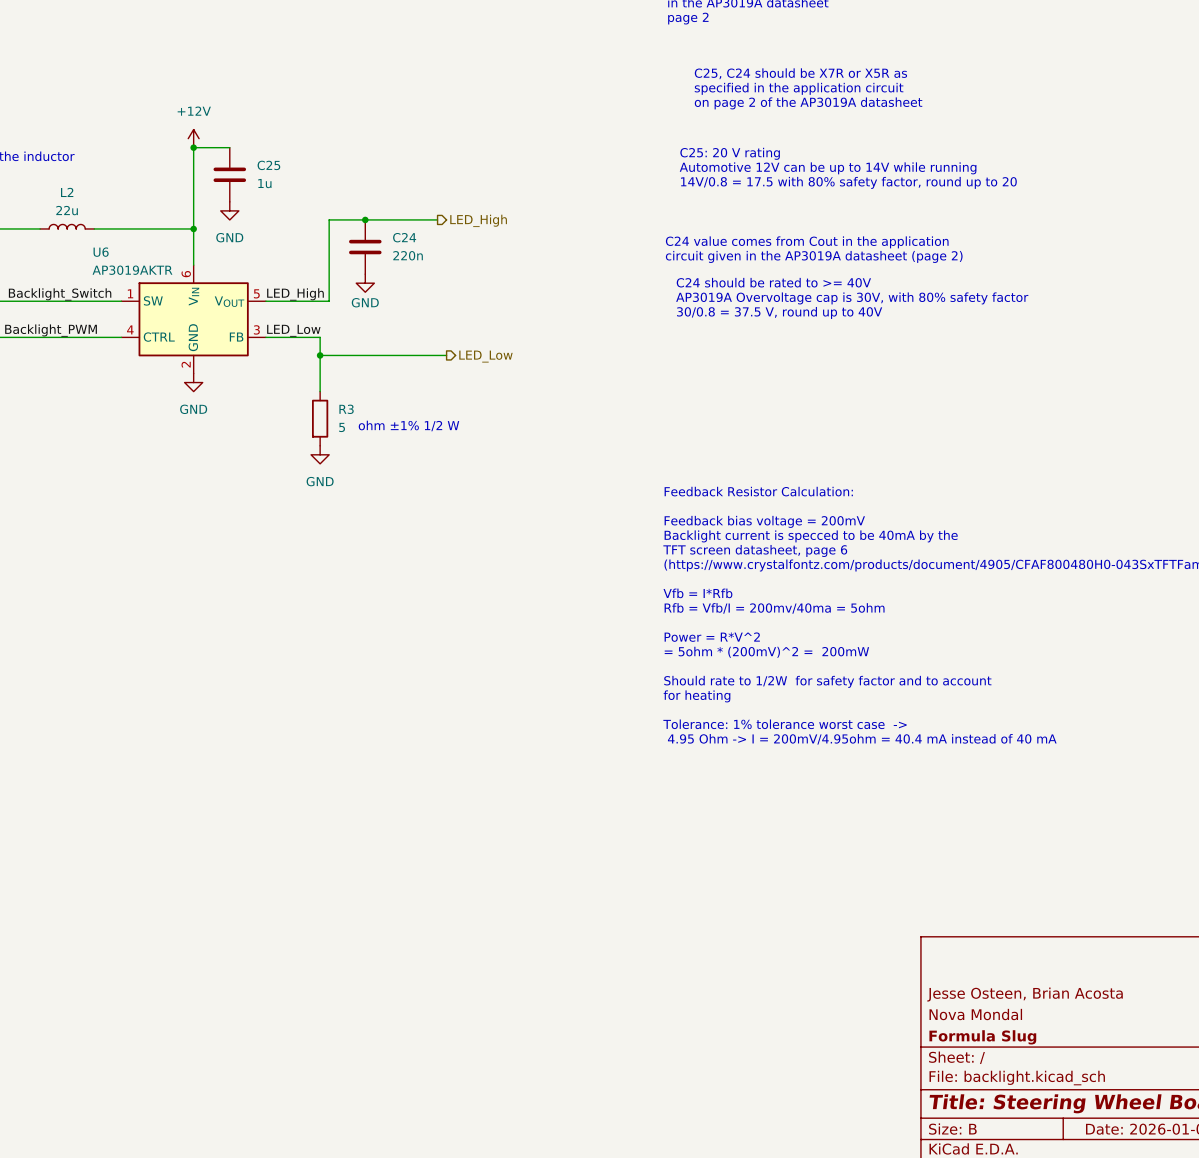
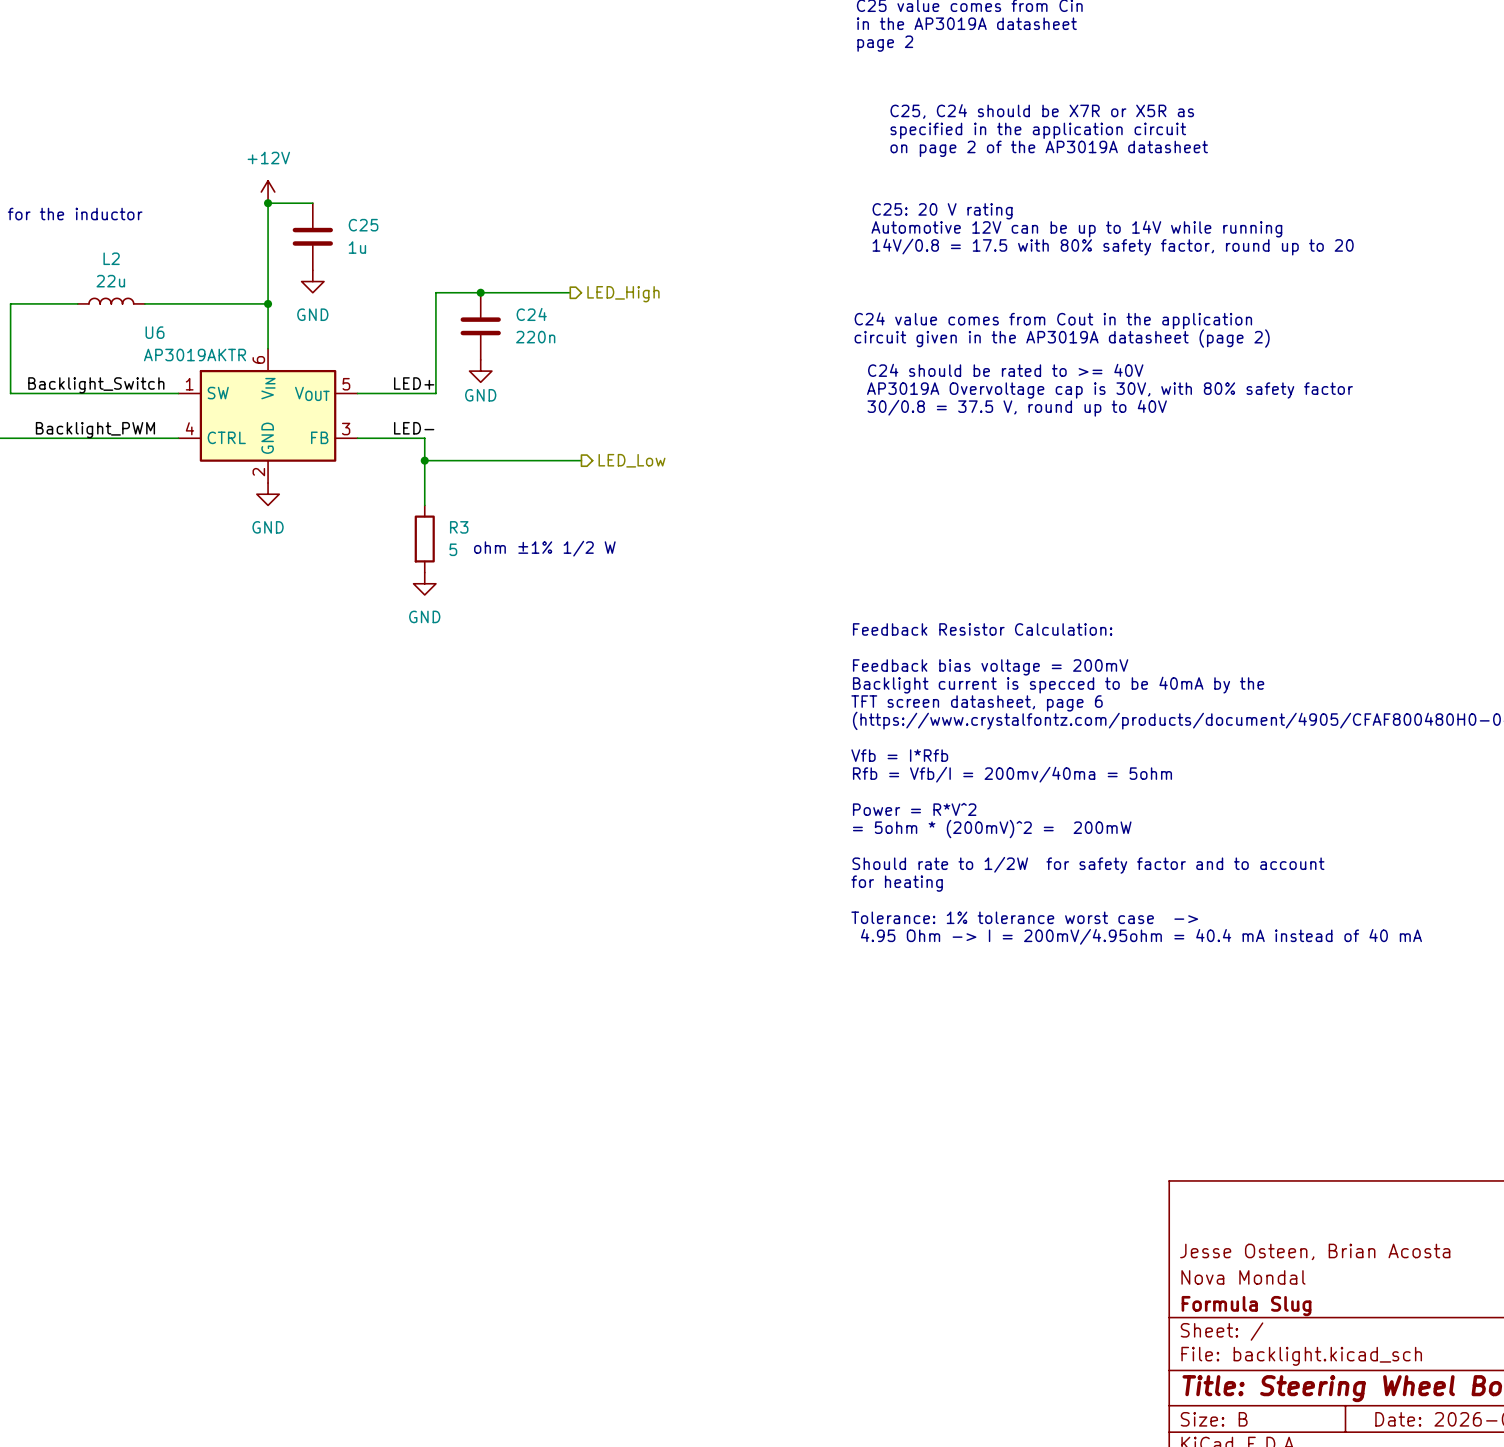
label: none -> LED+ (414, 383)
label: LED_High (295, 294) -> none
label: none -> LED- (414, 428)
label: LED_Low (293, 330) -> none

